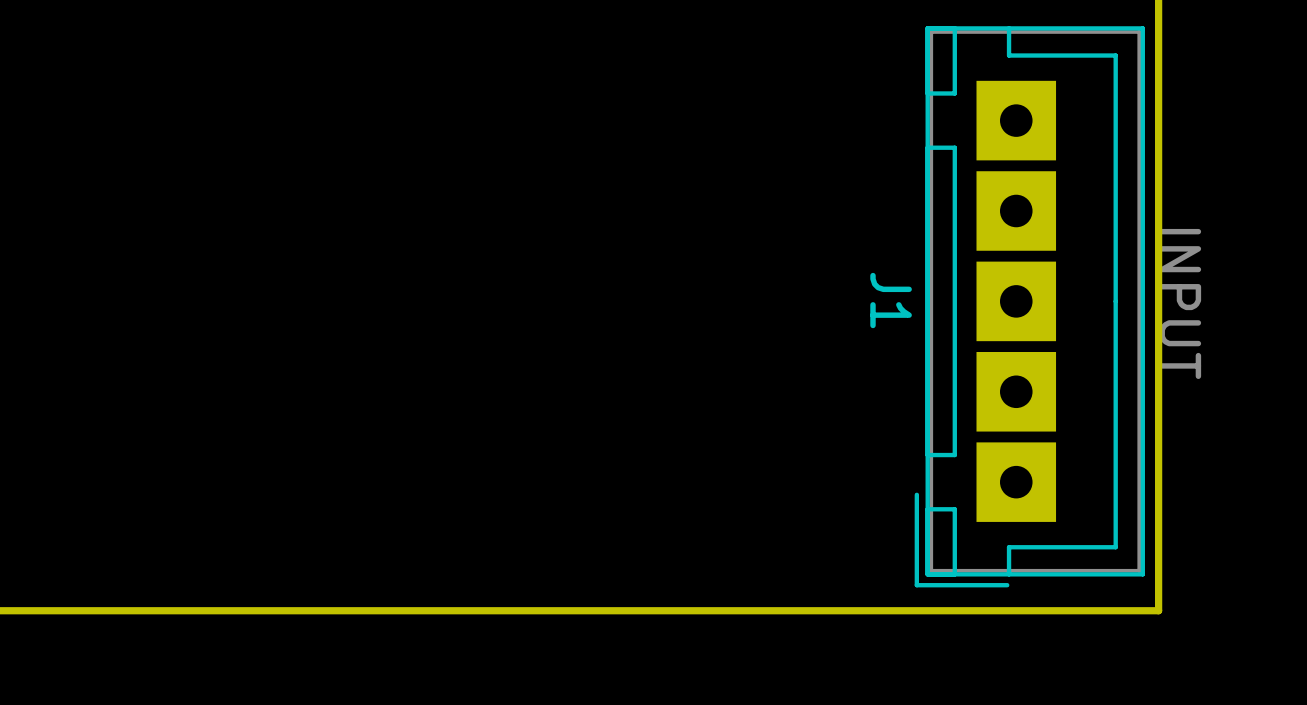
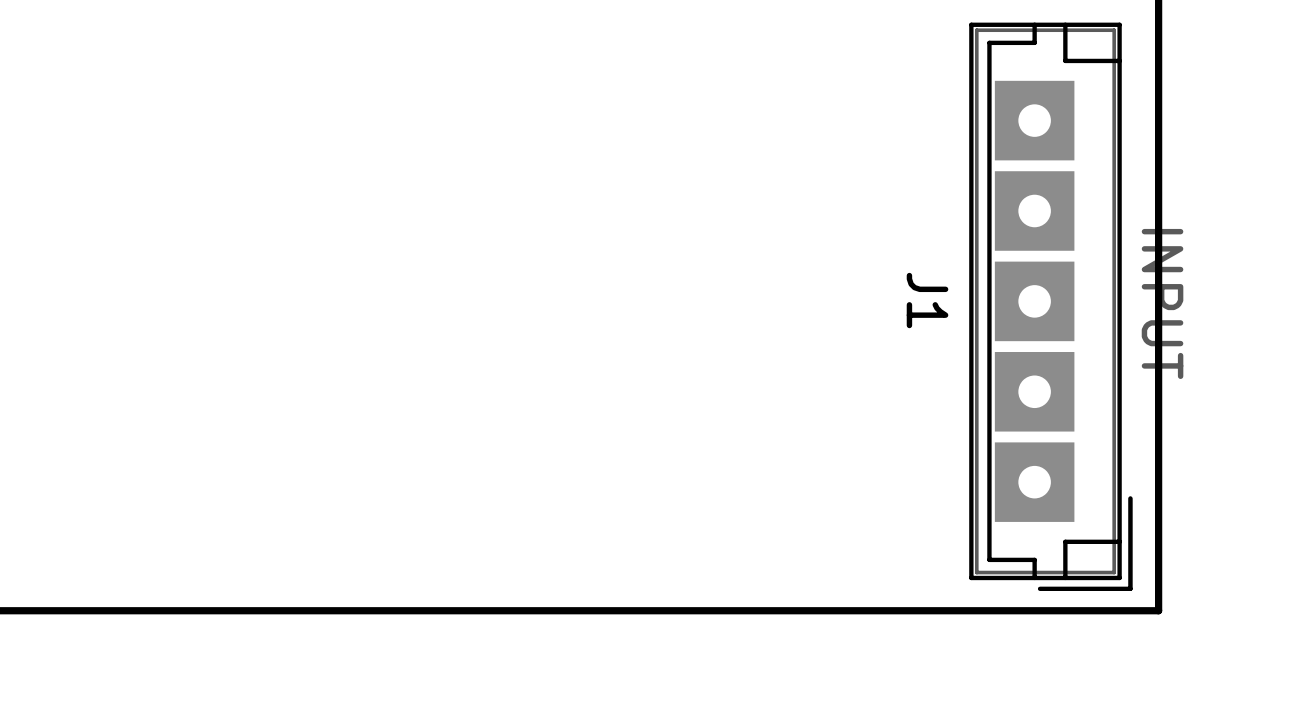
J1 footprint: [914, 26, 1145, 588] -> [969, 22, 1133, 591]

